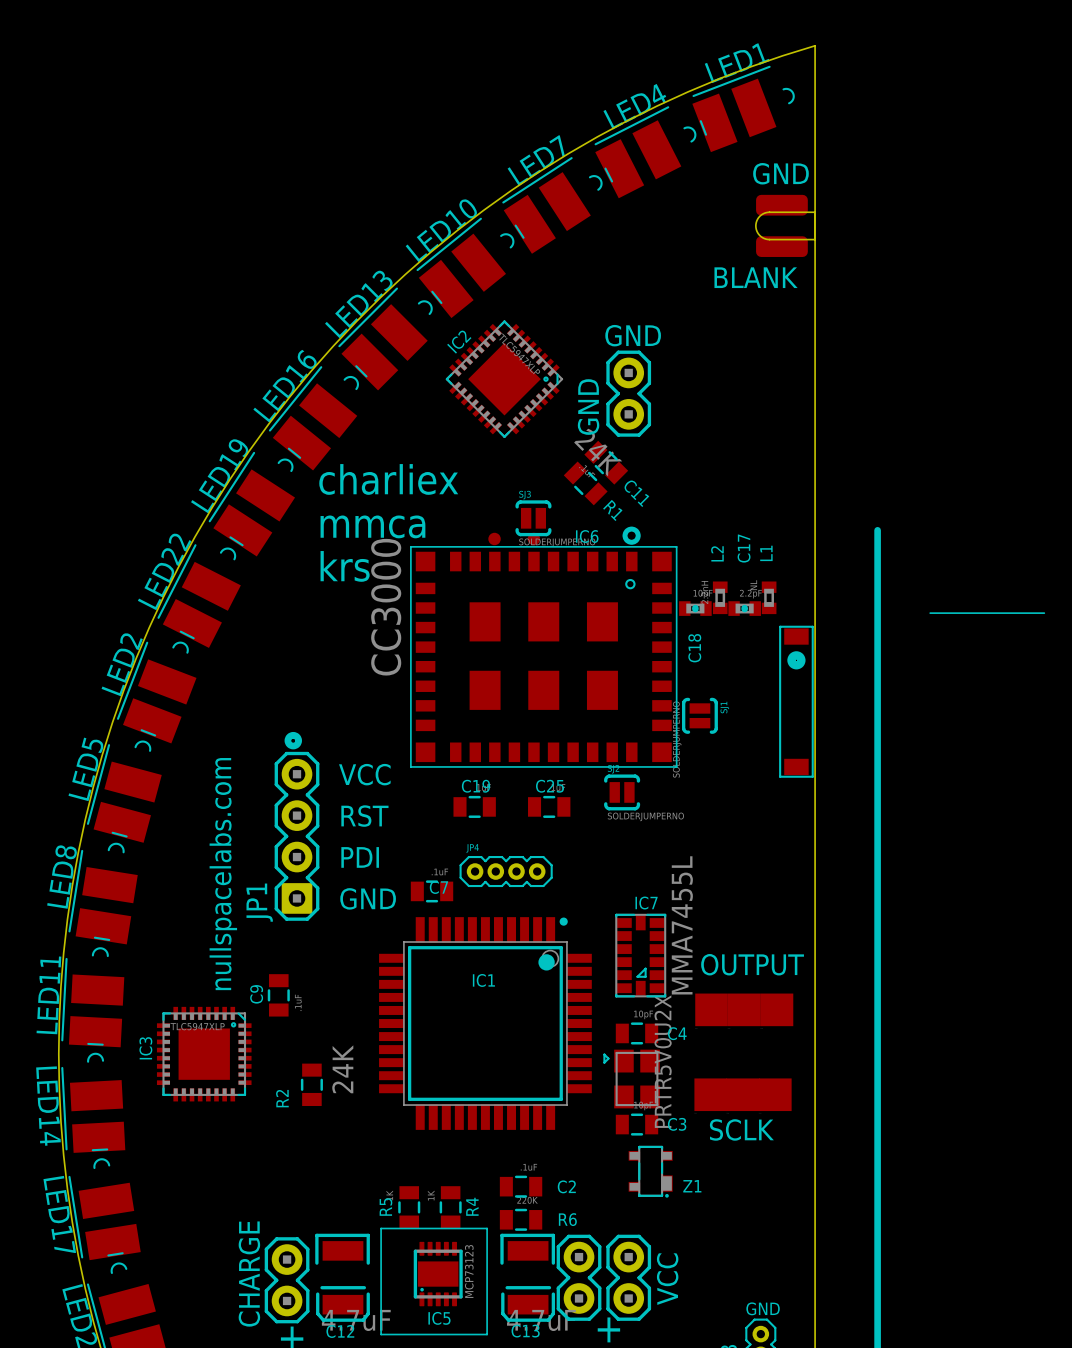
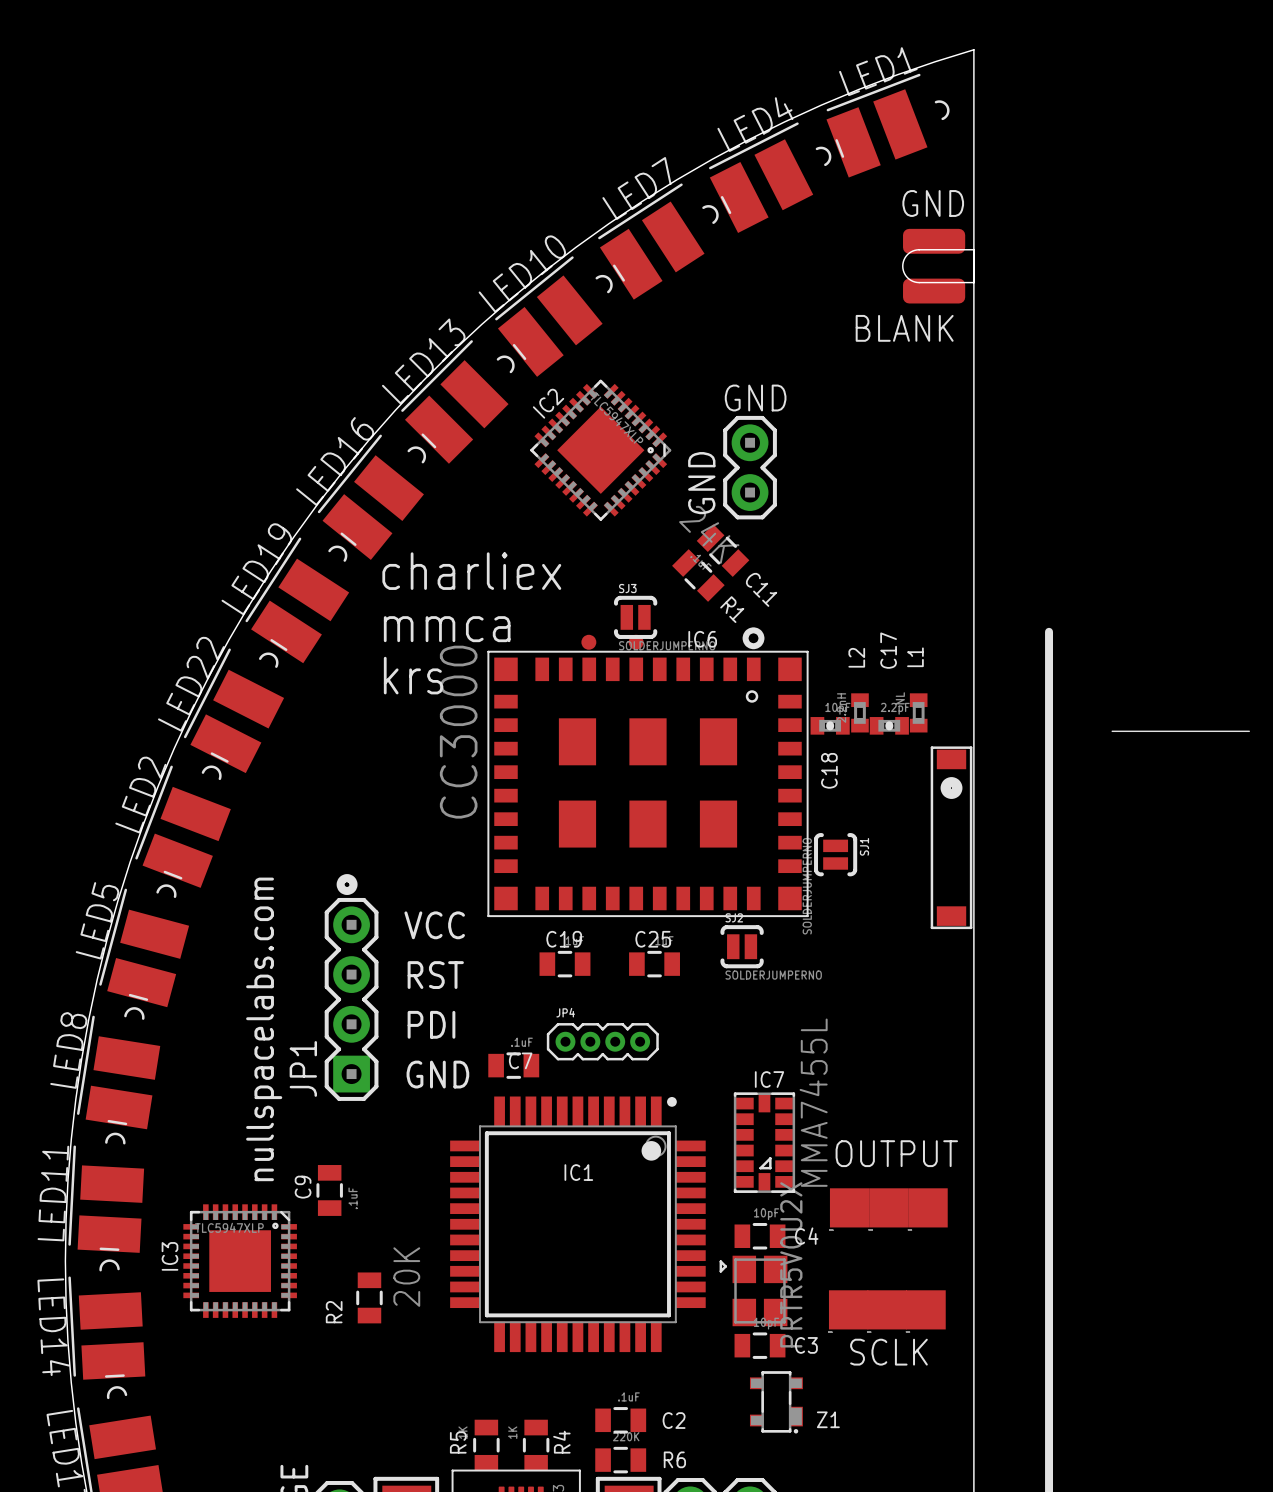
R2 value: 24K (342, 1069) -> 20K (406, 1277)

